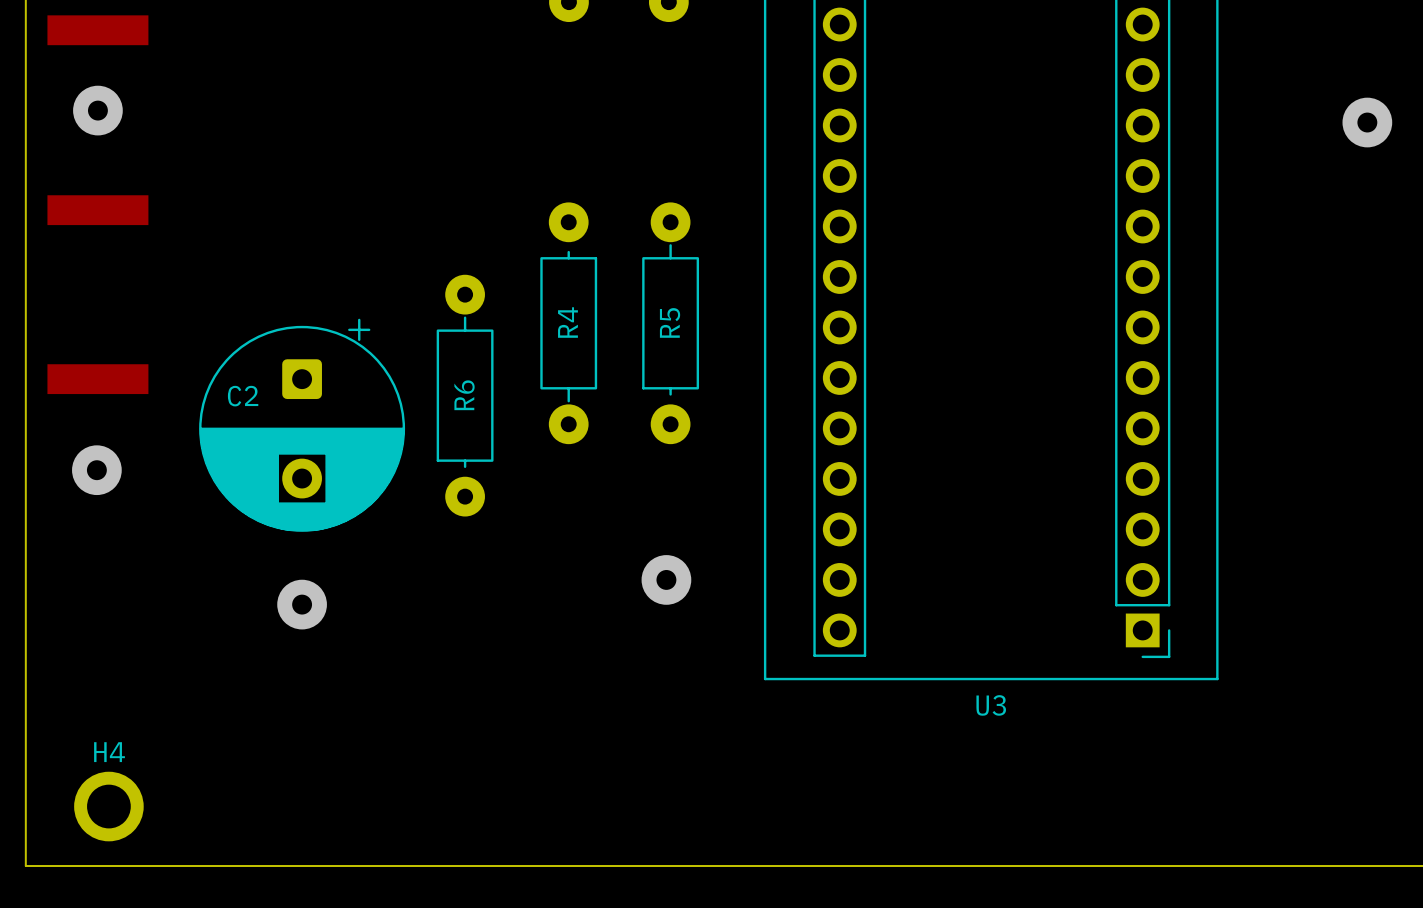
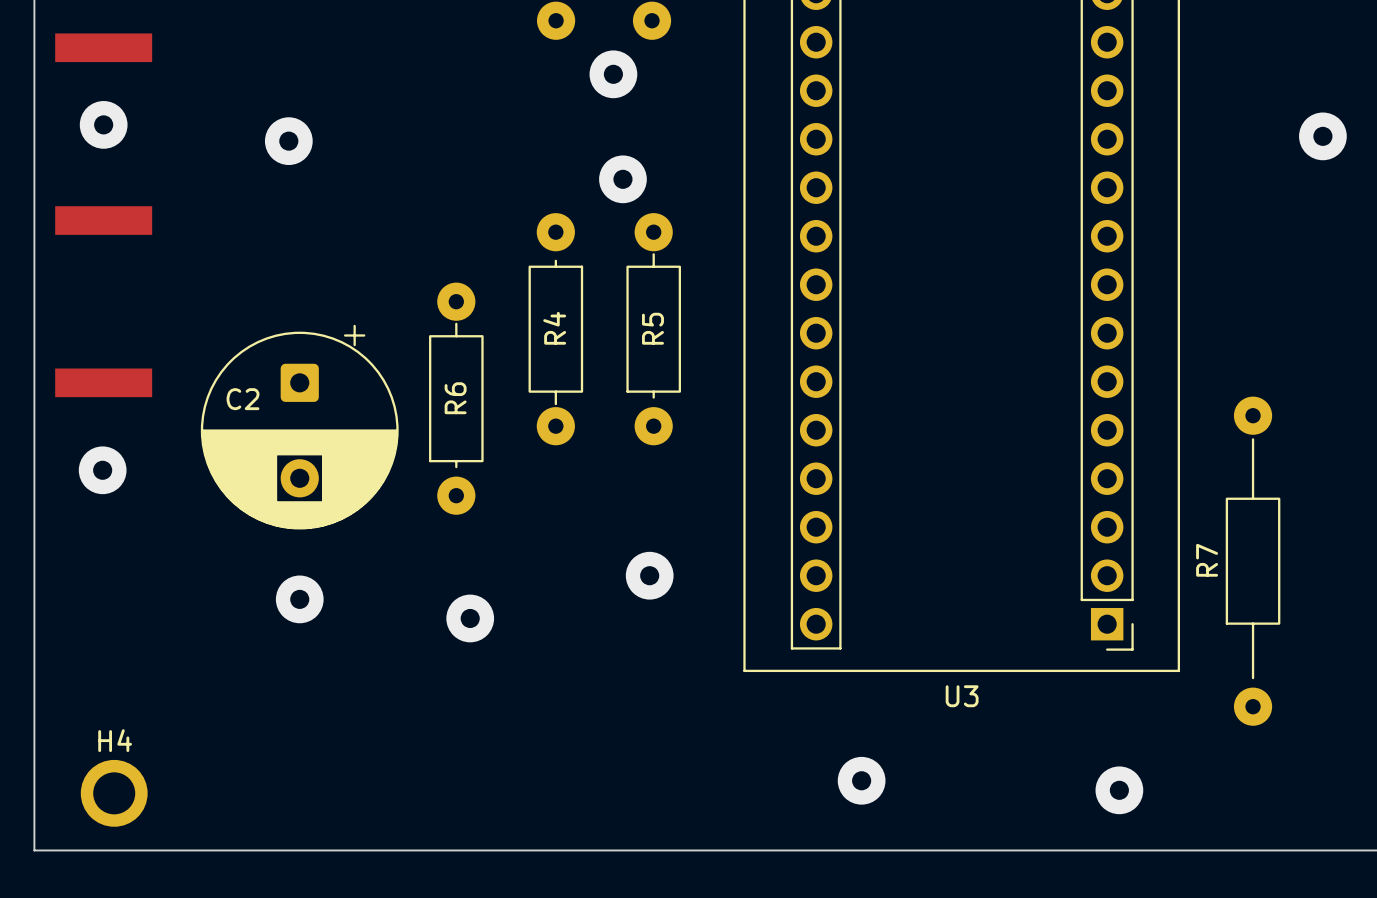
via: none -> (613, 74)
via: none -> (288, 141)
via: none -> (622, 179)
R7: none -> (1253, 561)
via: none -> (470, 618)
via: none -> (861, 780)
via: none -> (1119, 790)

